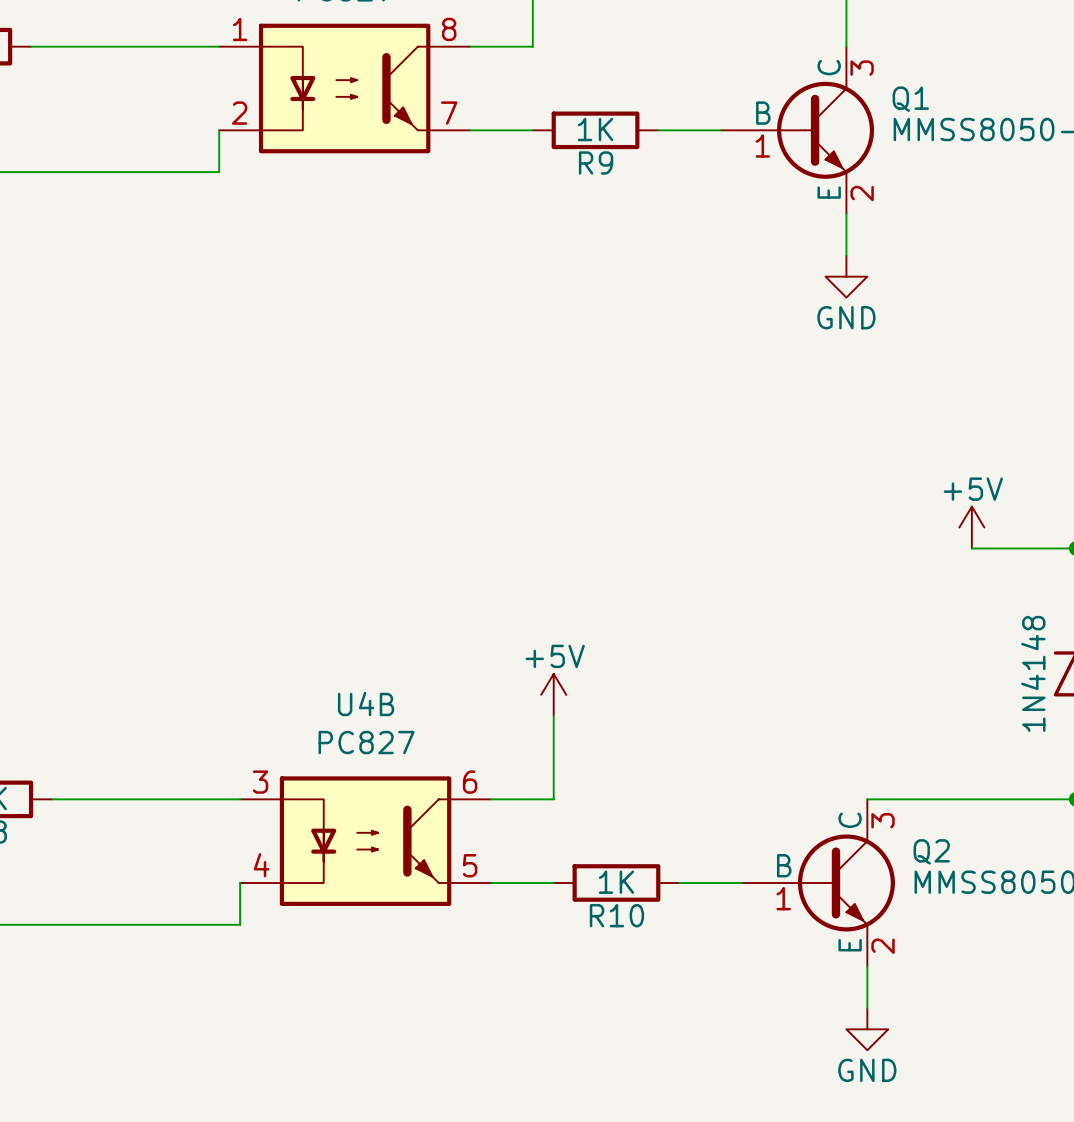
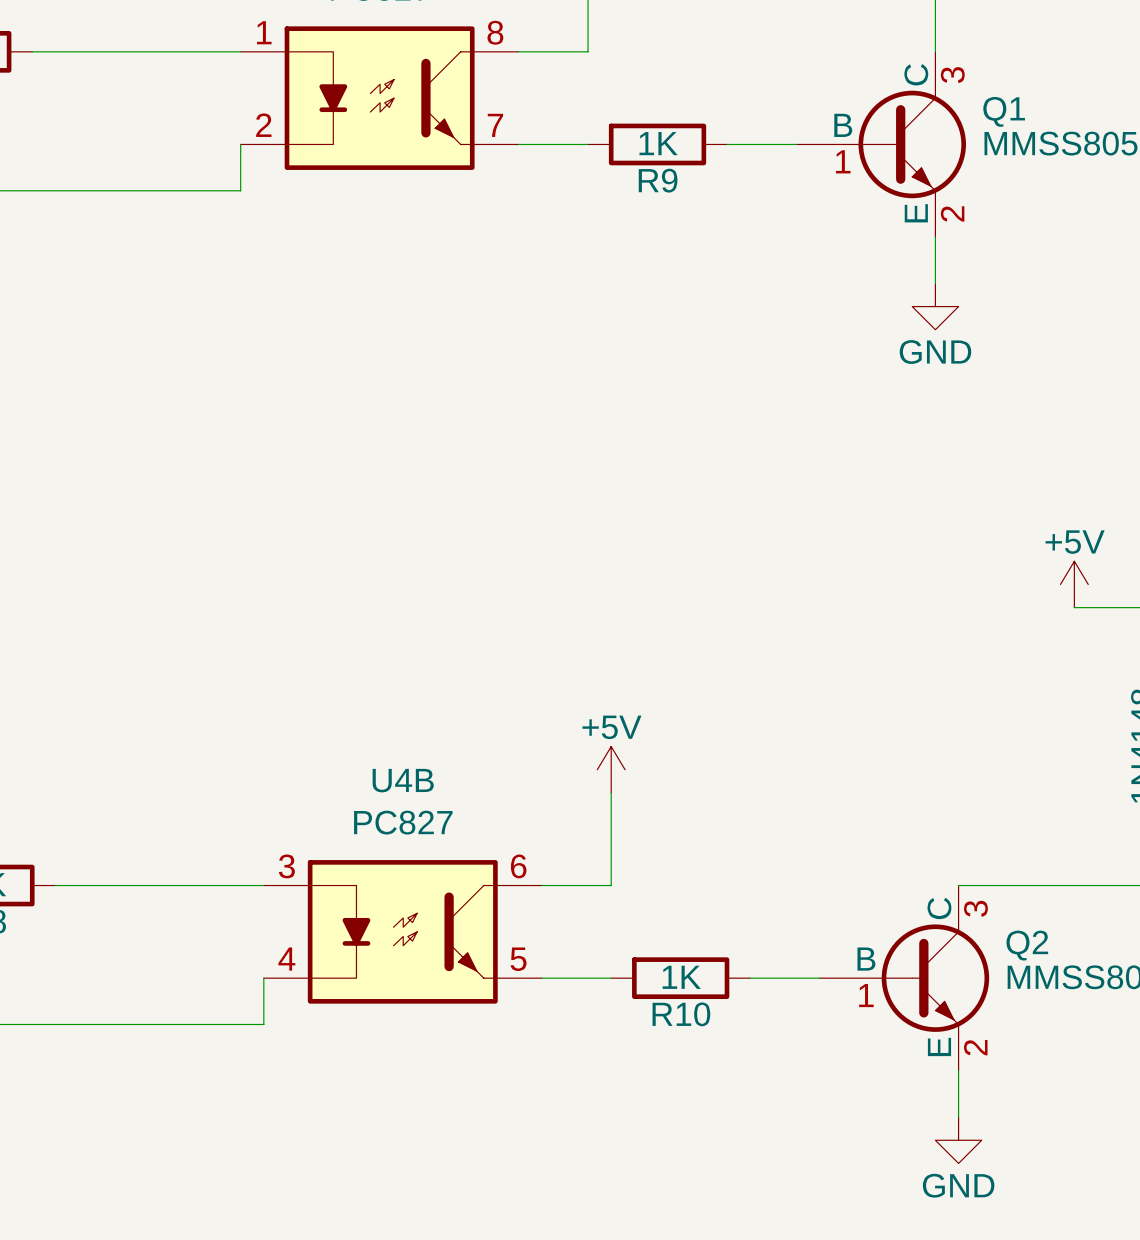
part symbol: [219, 23, 471, 154] -> [240, 26, 519, 170]
U4B symbol: [240, 776, 492, 906] -> [263, 860, 542, 1004]

